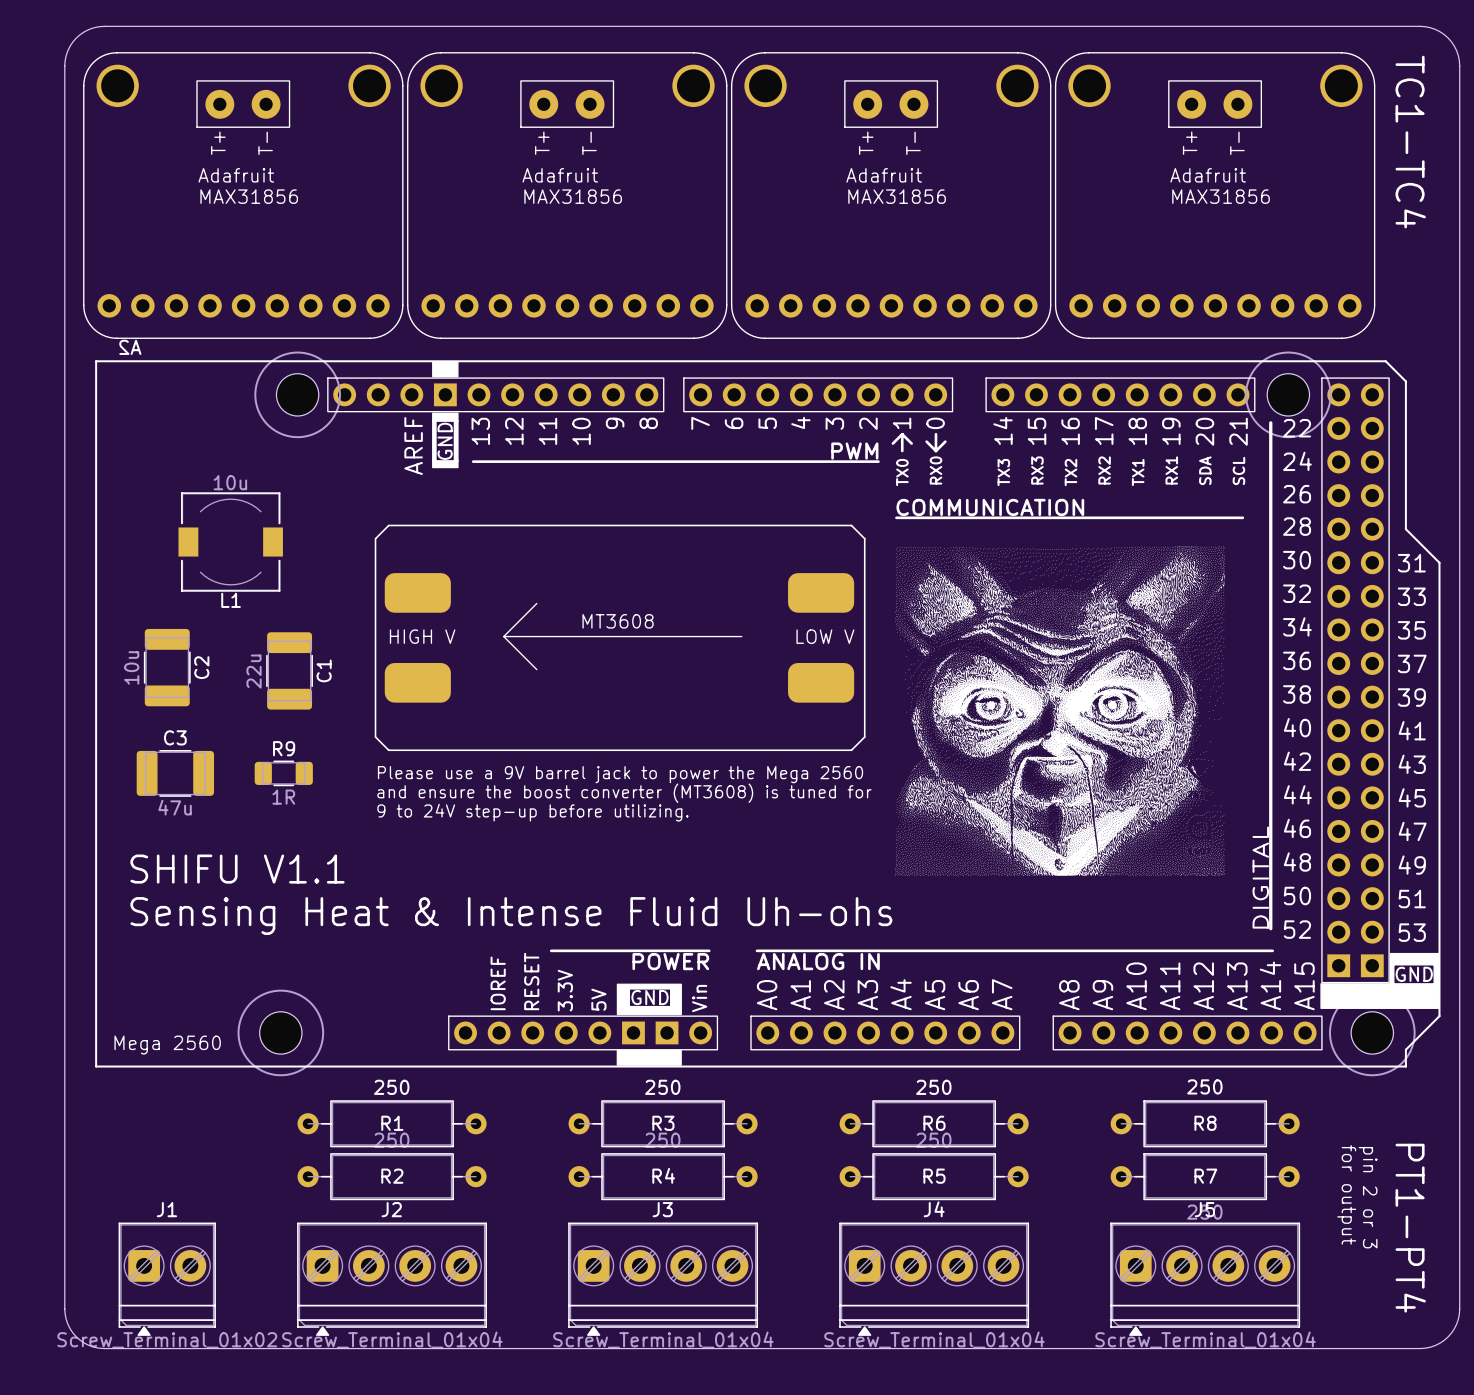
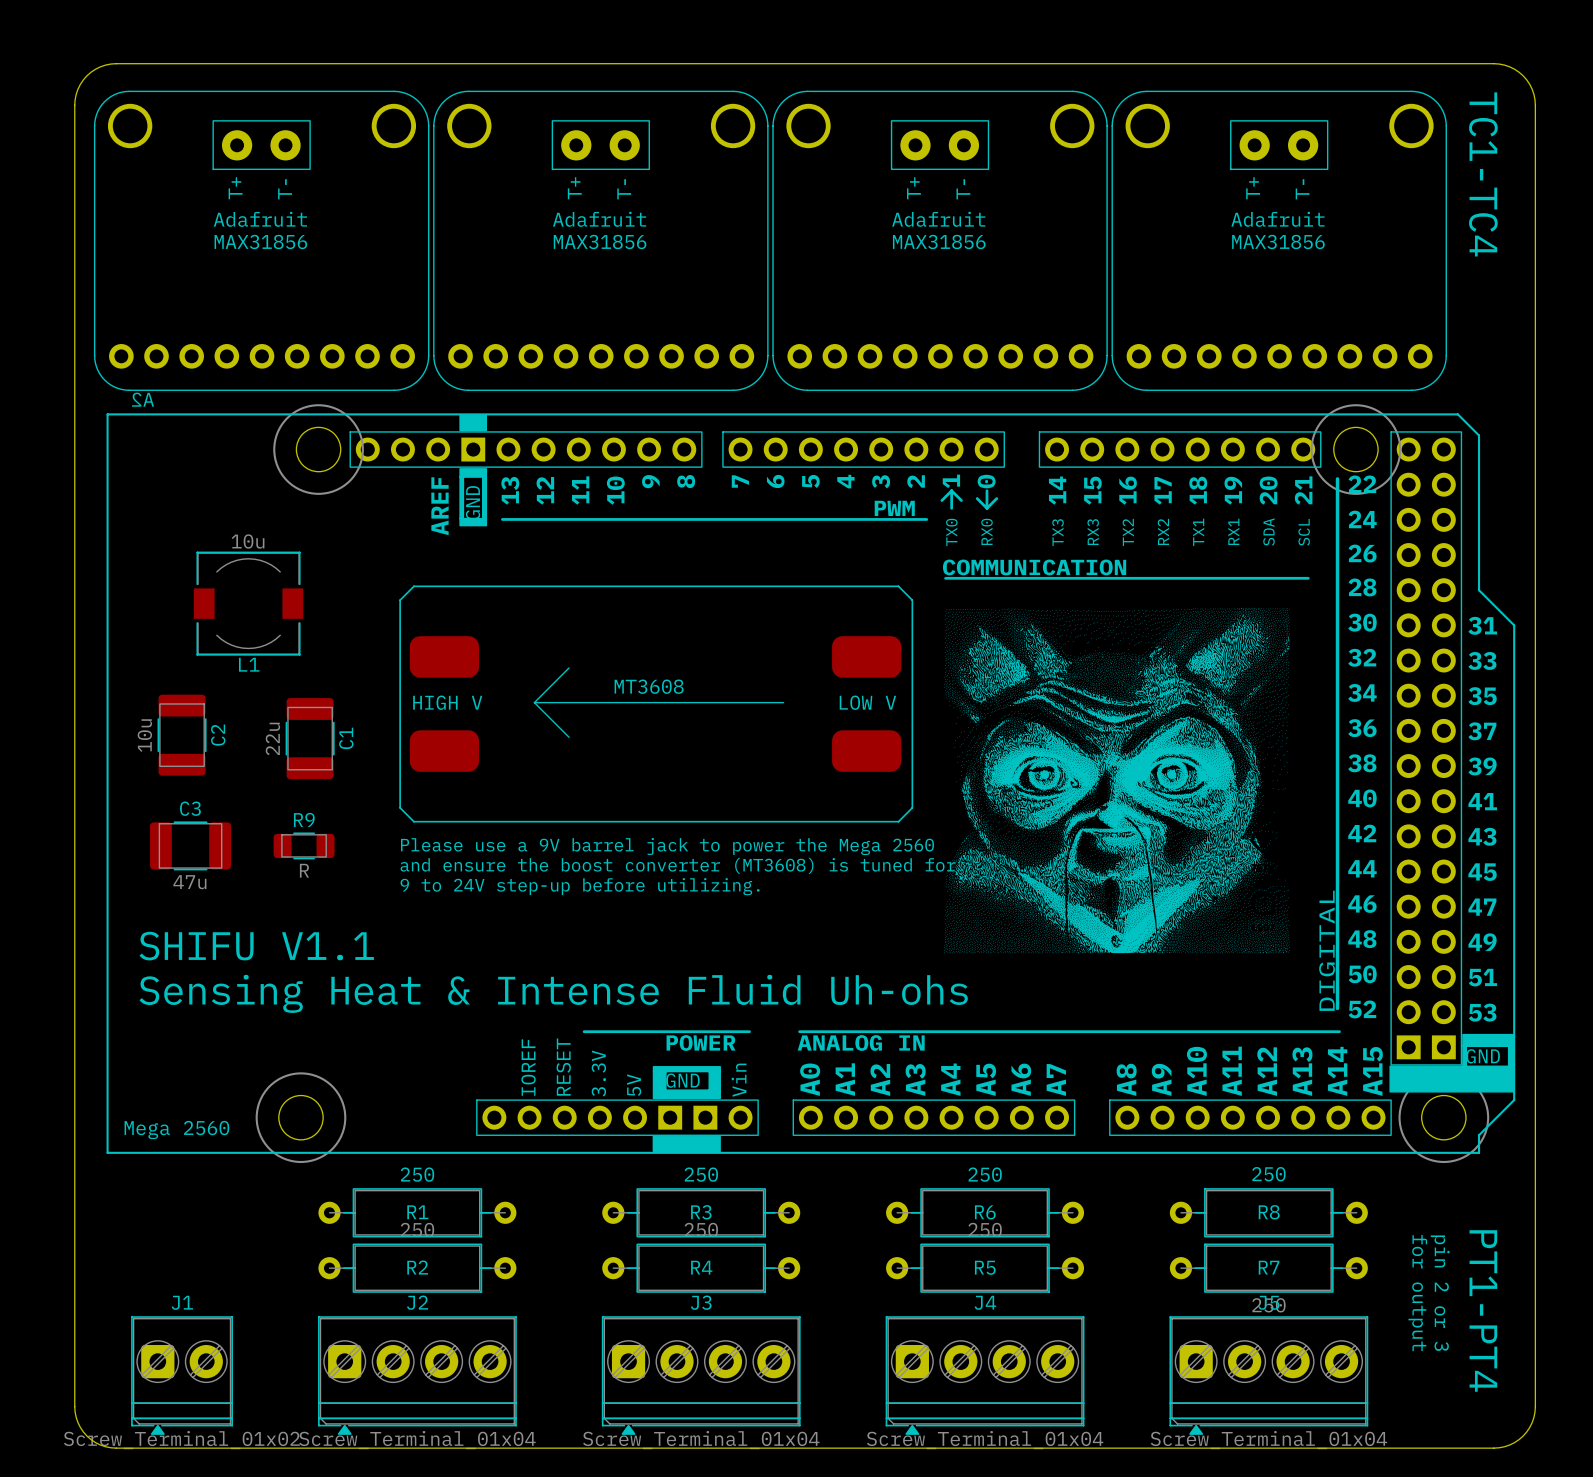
R9 value: 1R (283, 797) -> R (304, 870)

